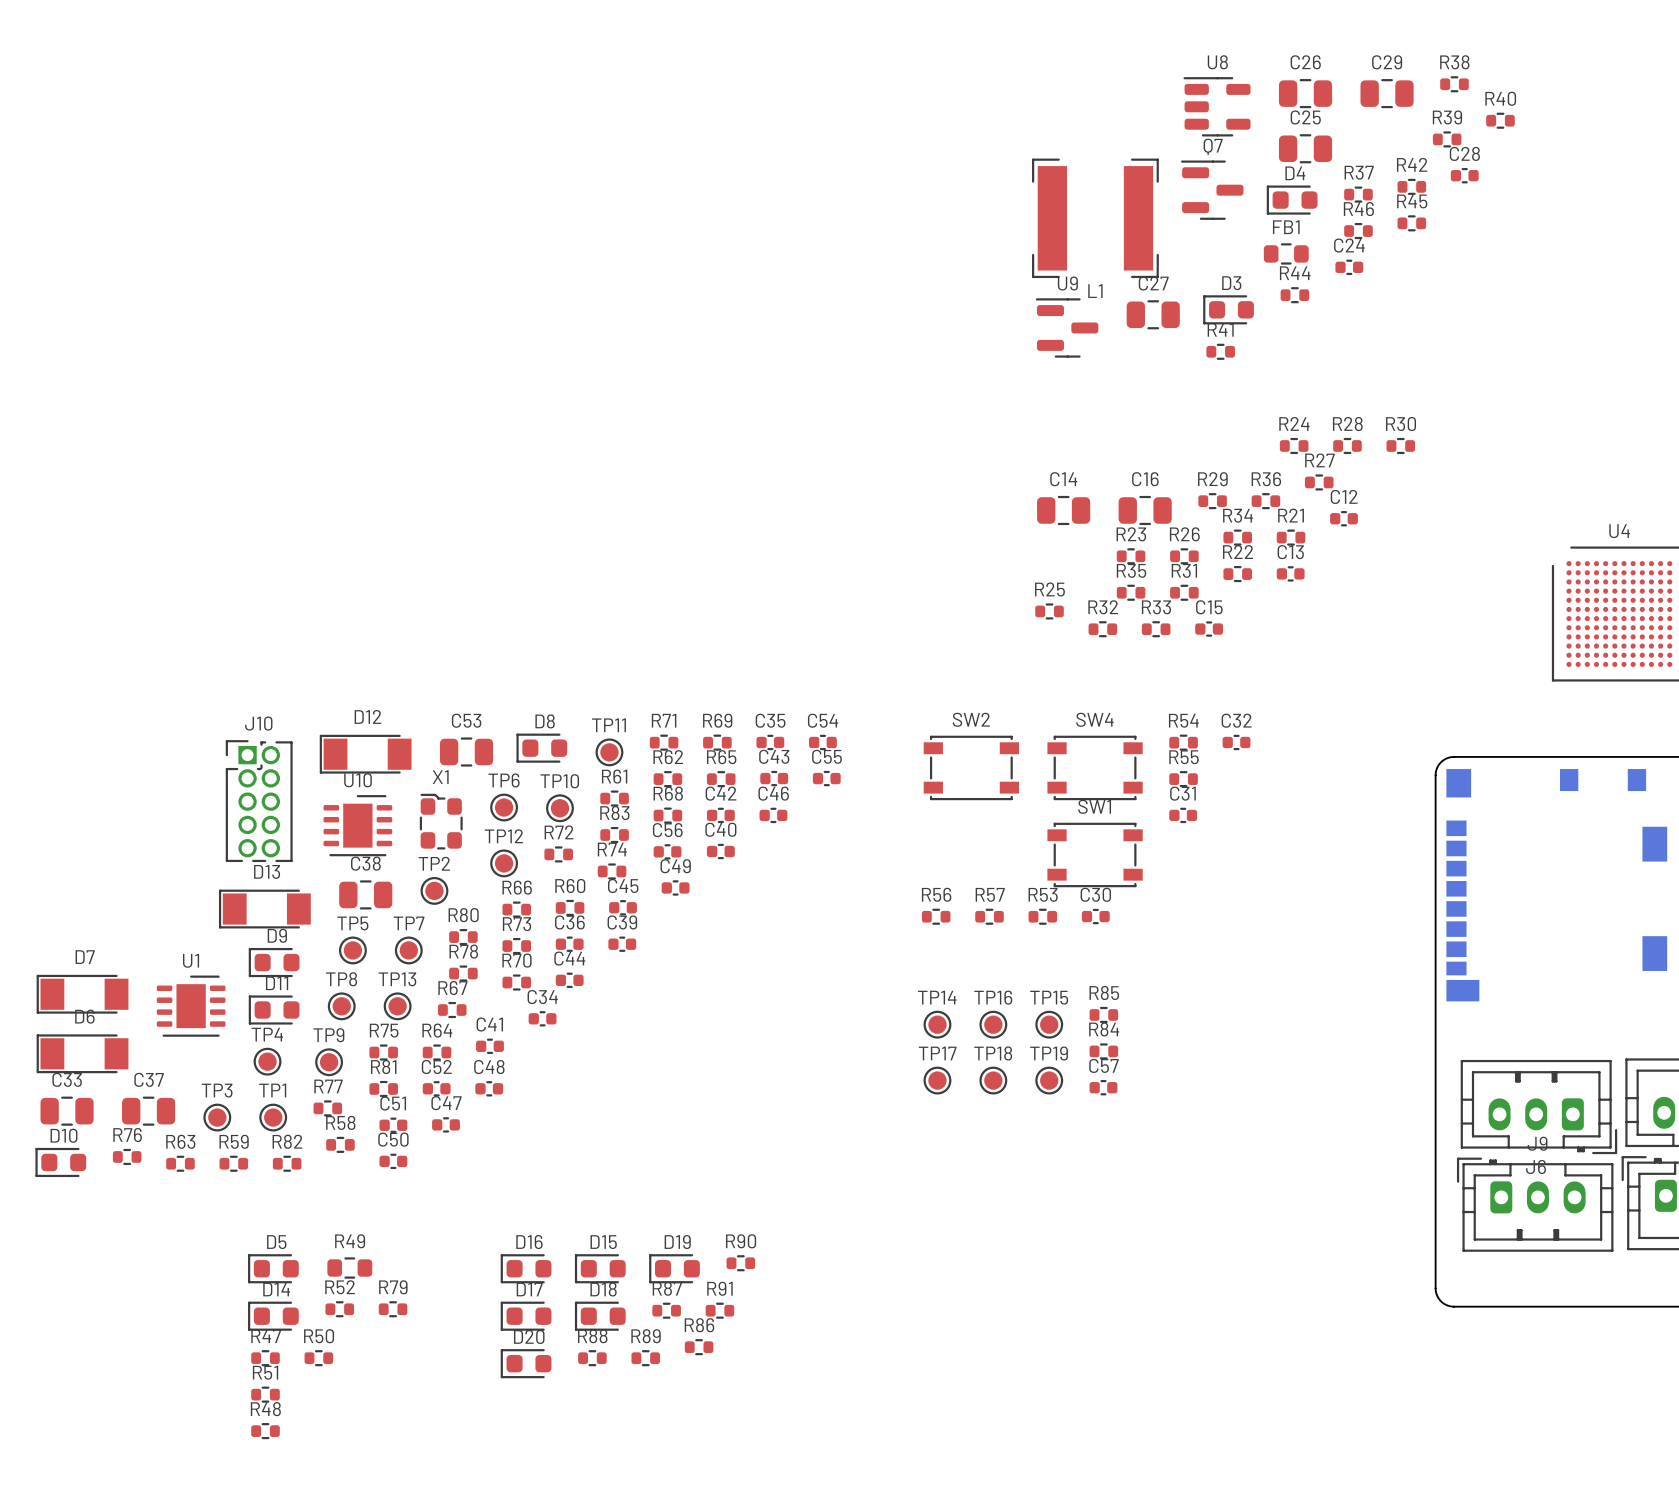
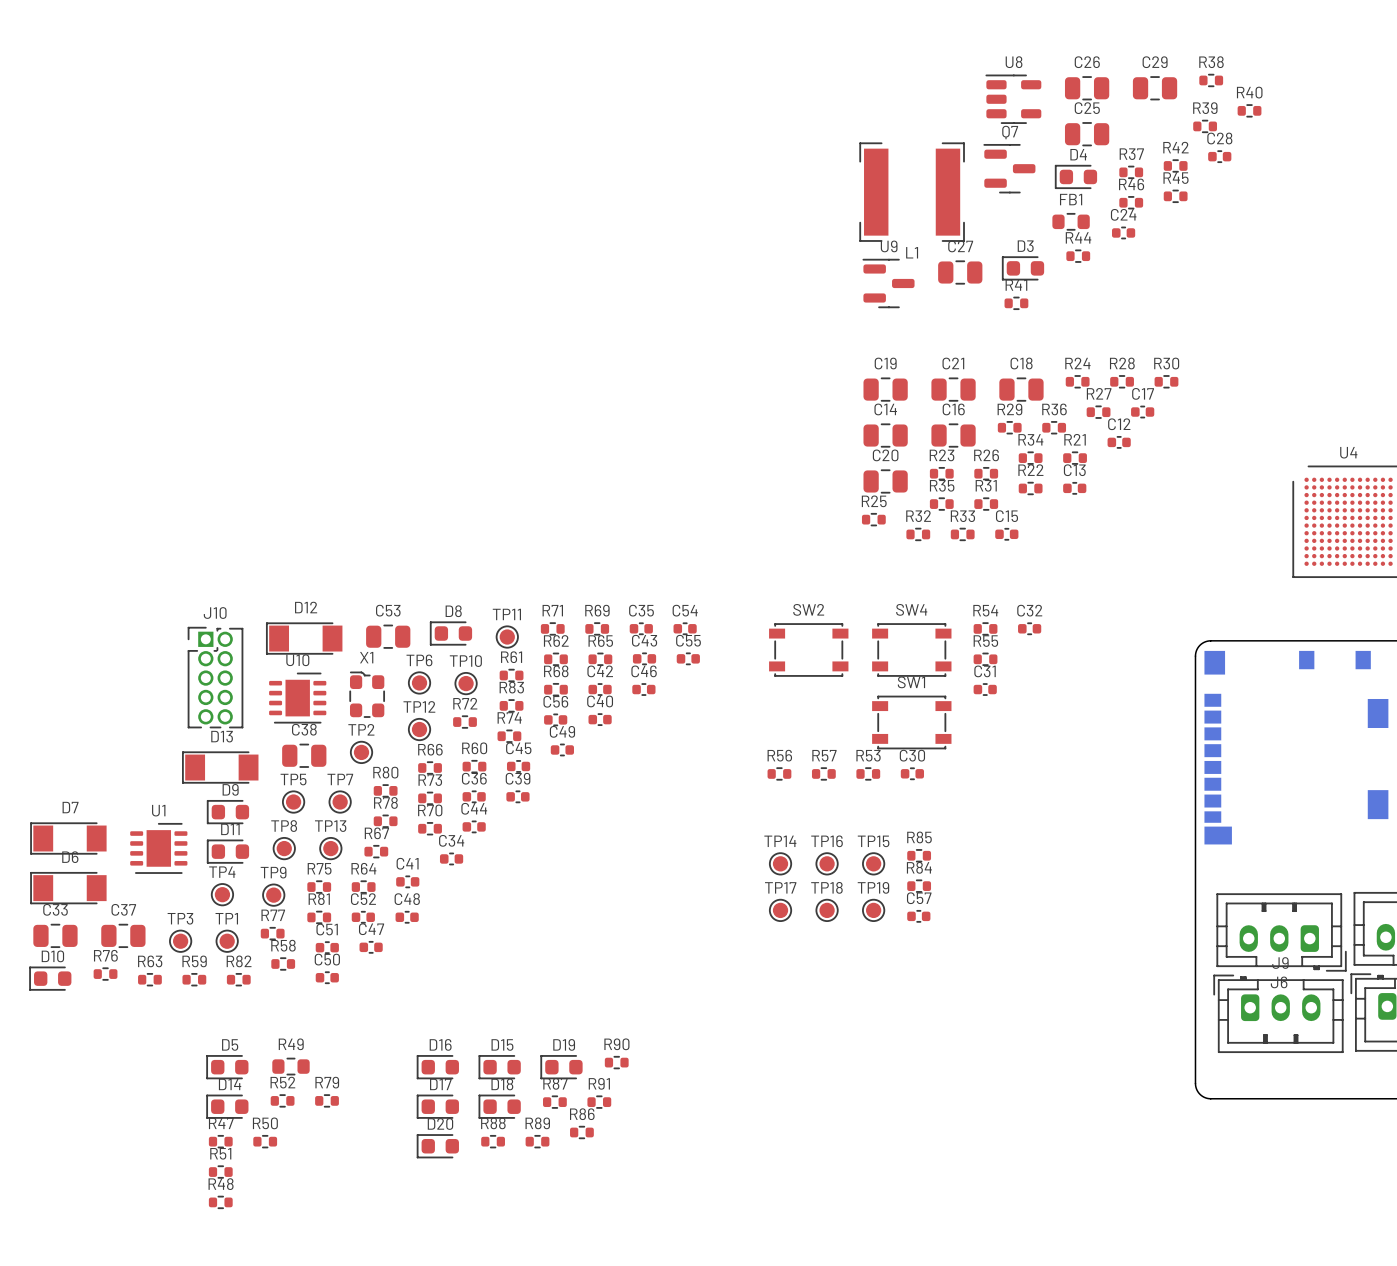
C19: none -> (885, 389)
C21: none -> (953, 389)
C18: none -> (1021, 389)
C17: none -> (1142, 412)
C20: none -> (885, 481)

